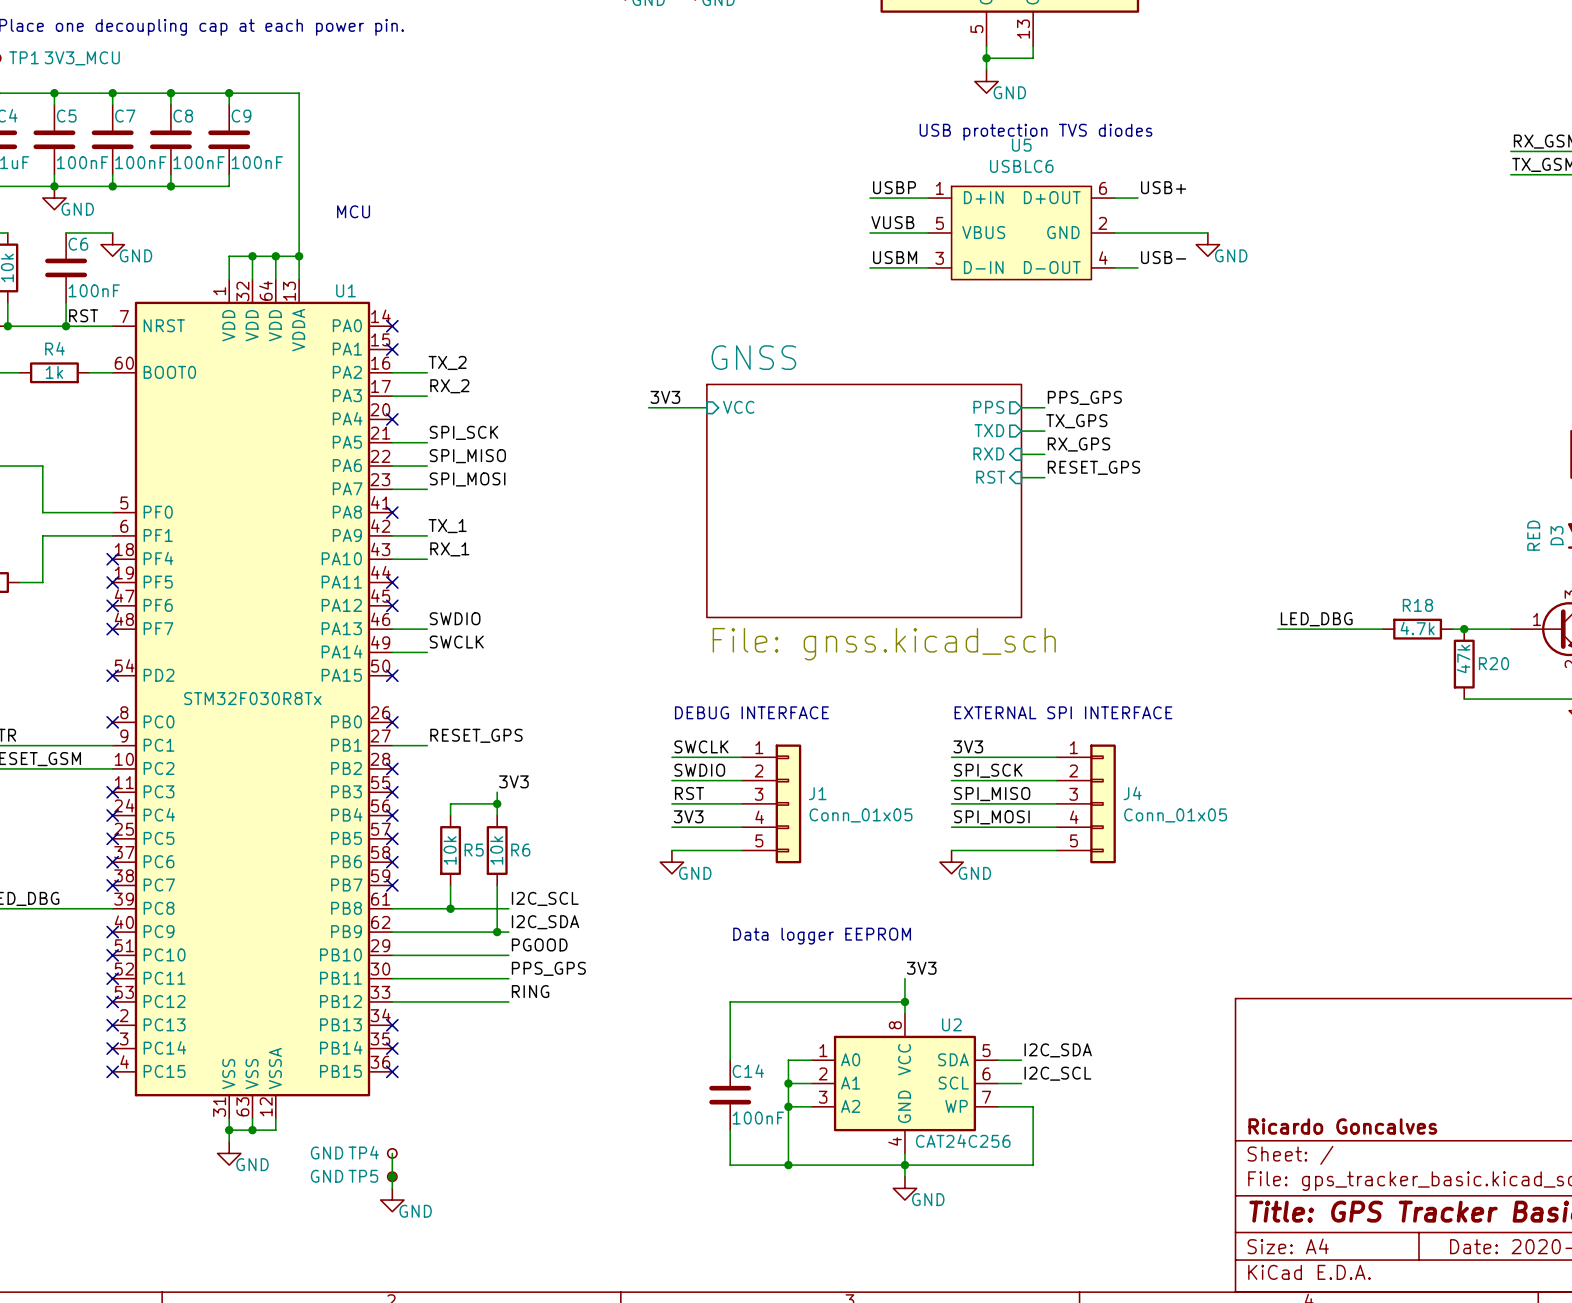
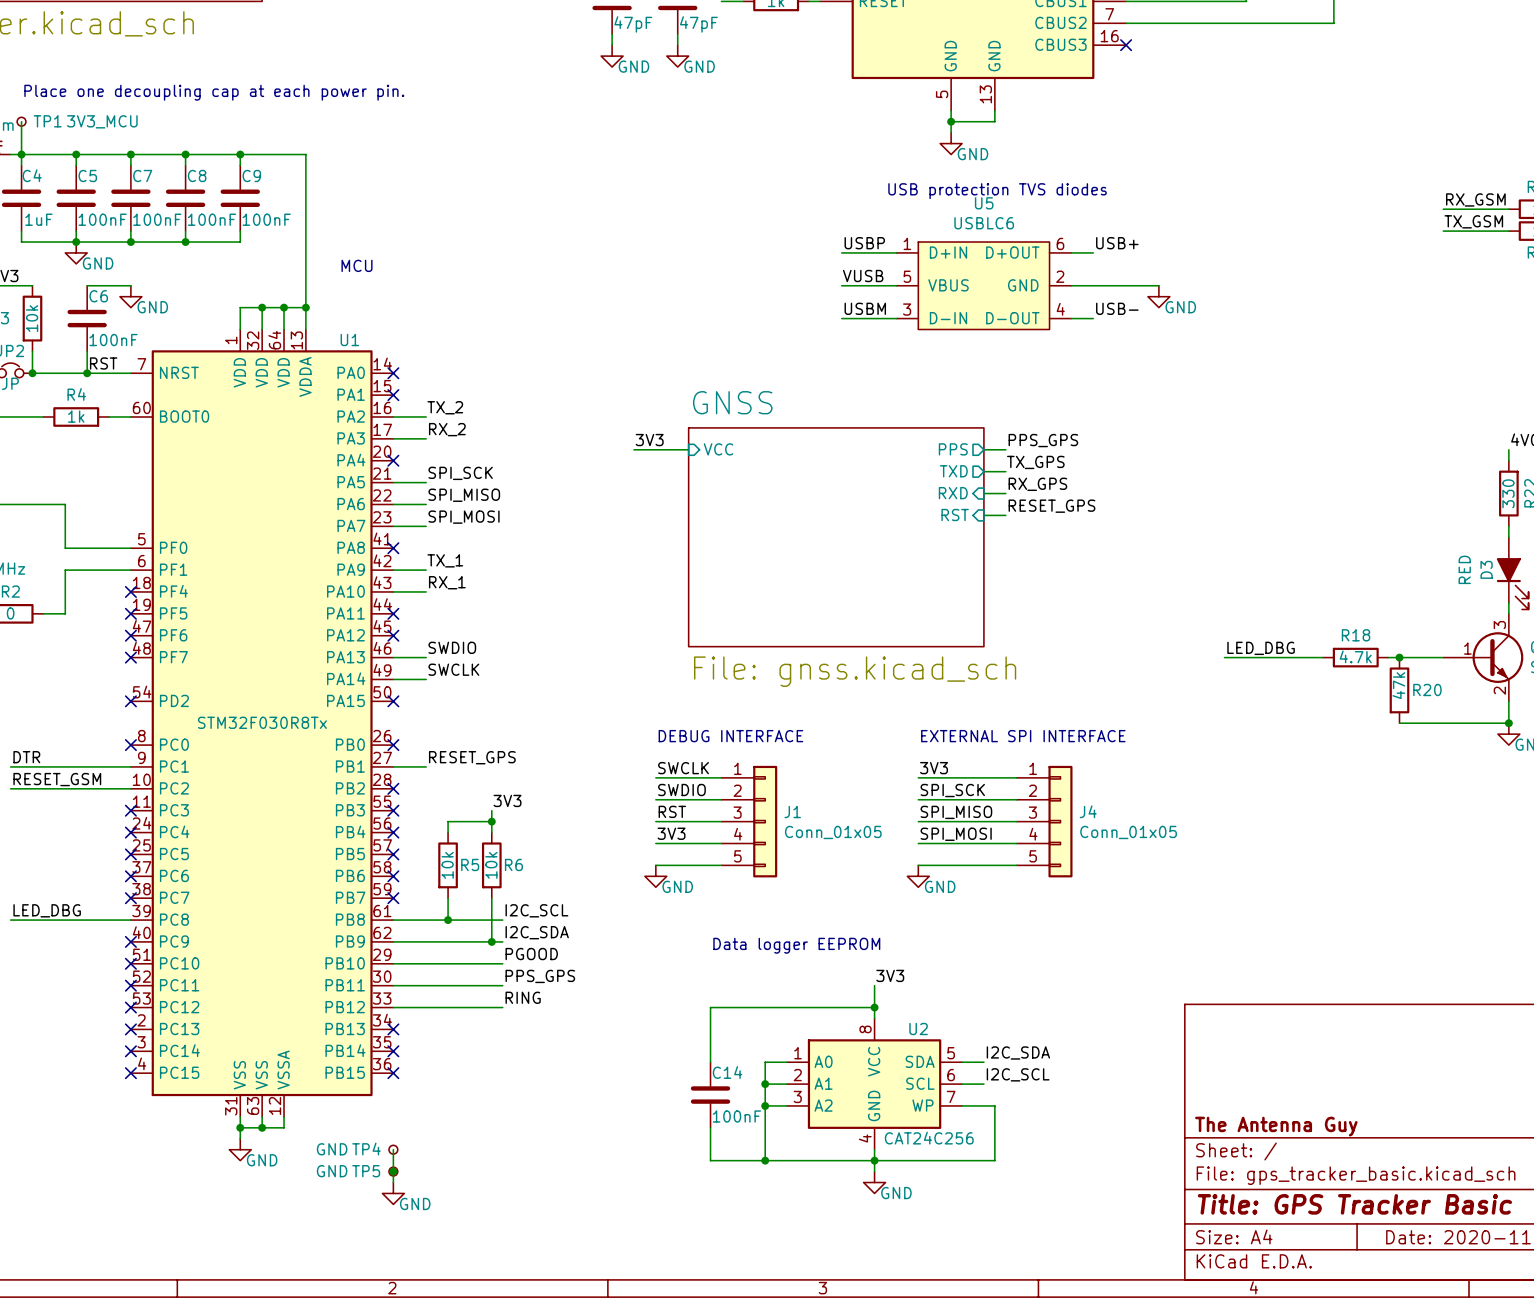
title block: Ricardo Goncalves (1342, 1126) -> The Antenna Guy (1276, 1126)

